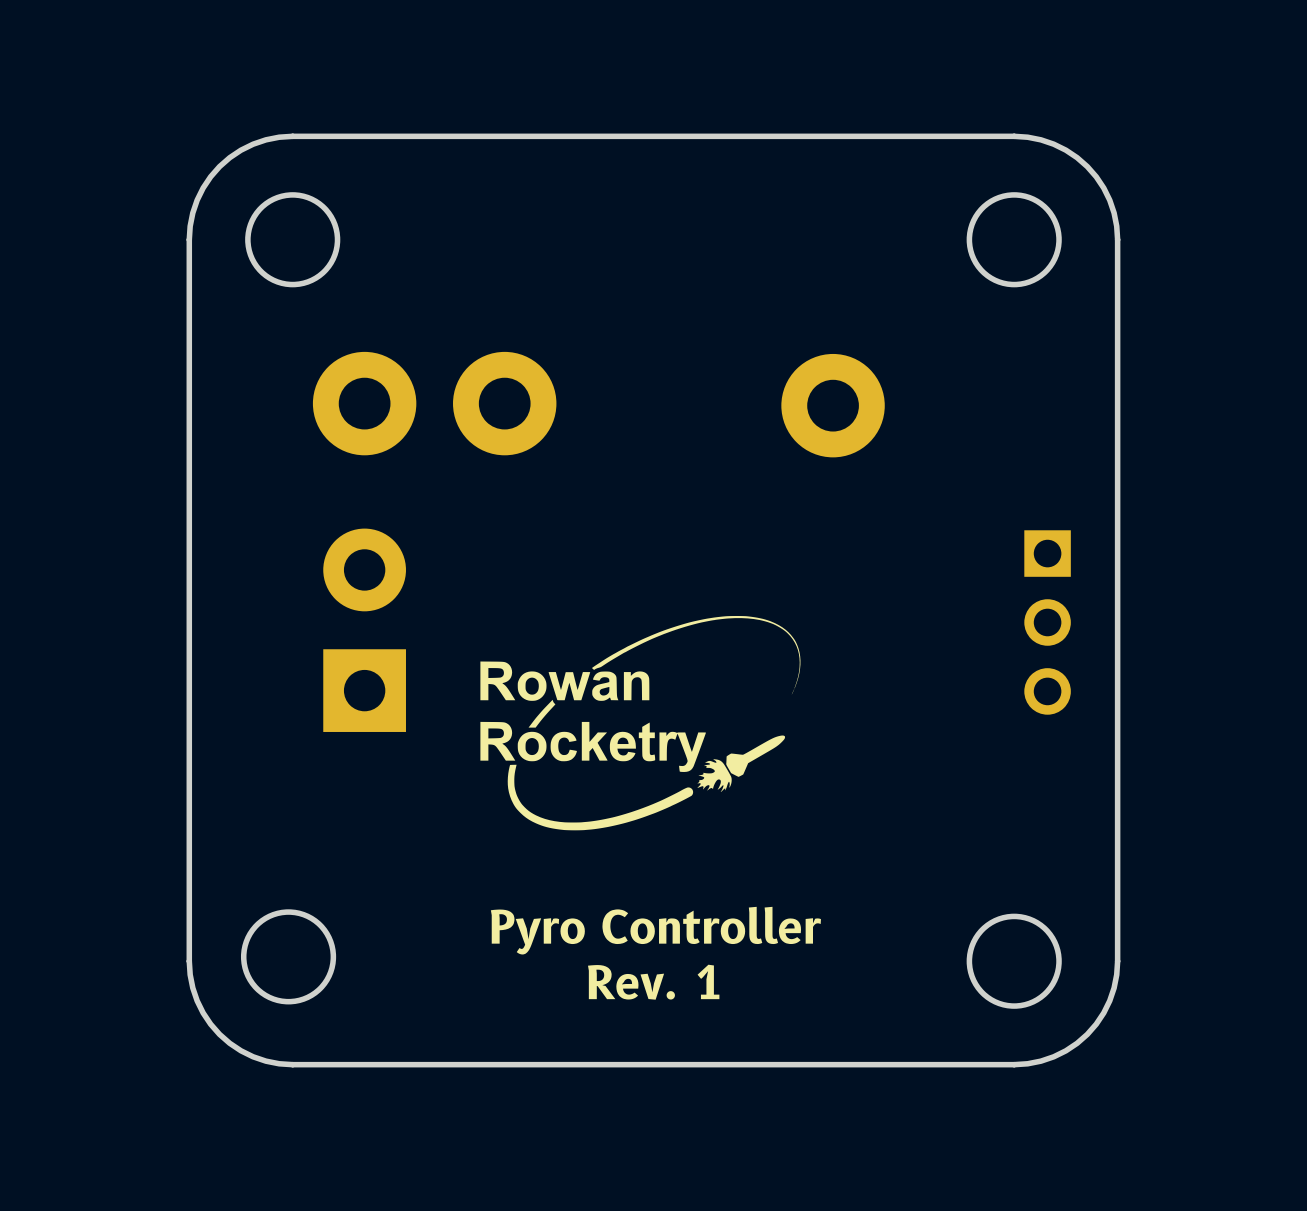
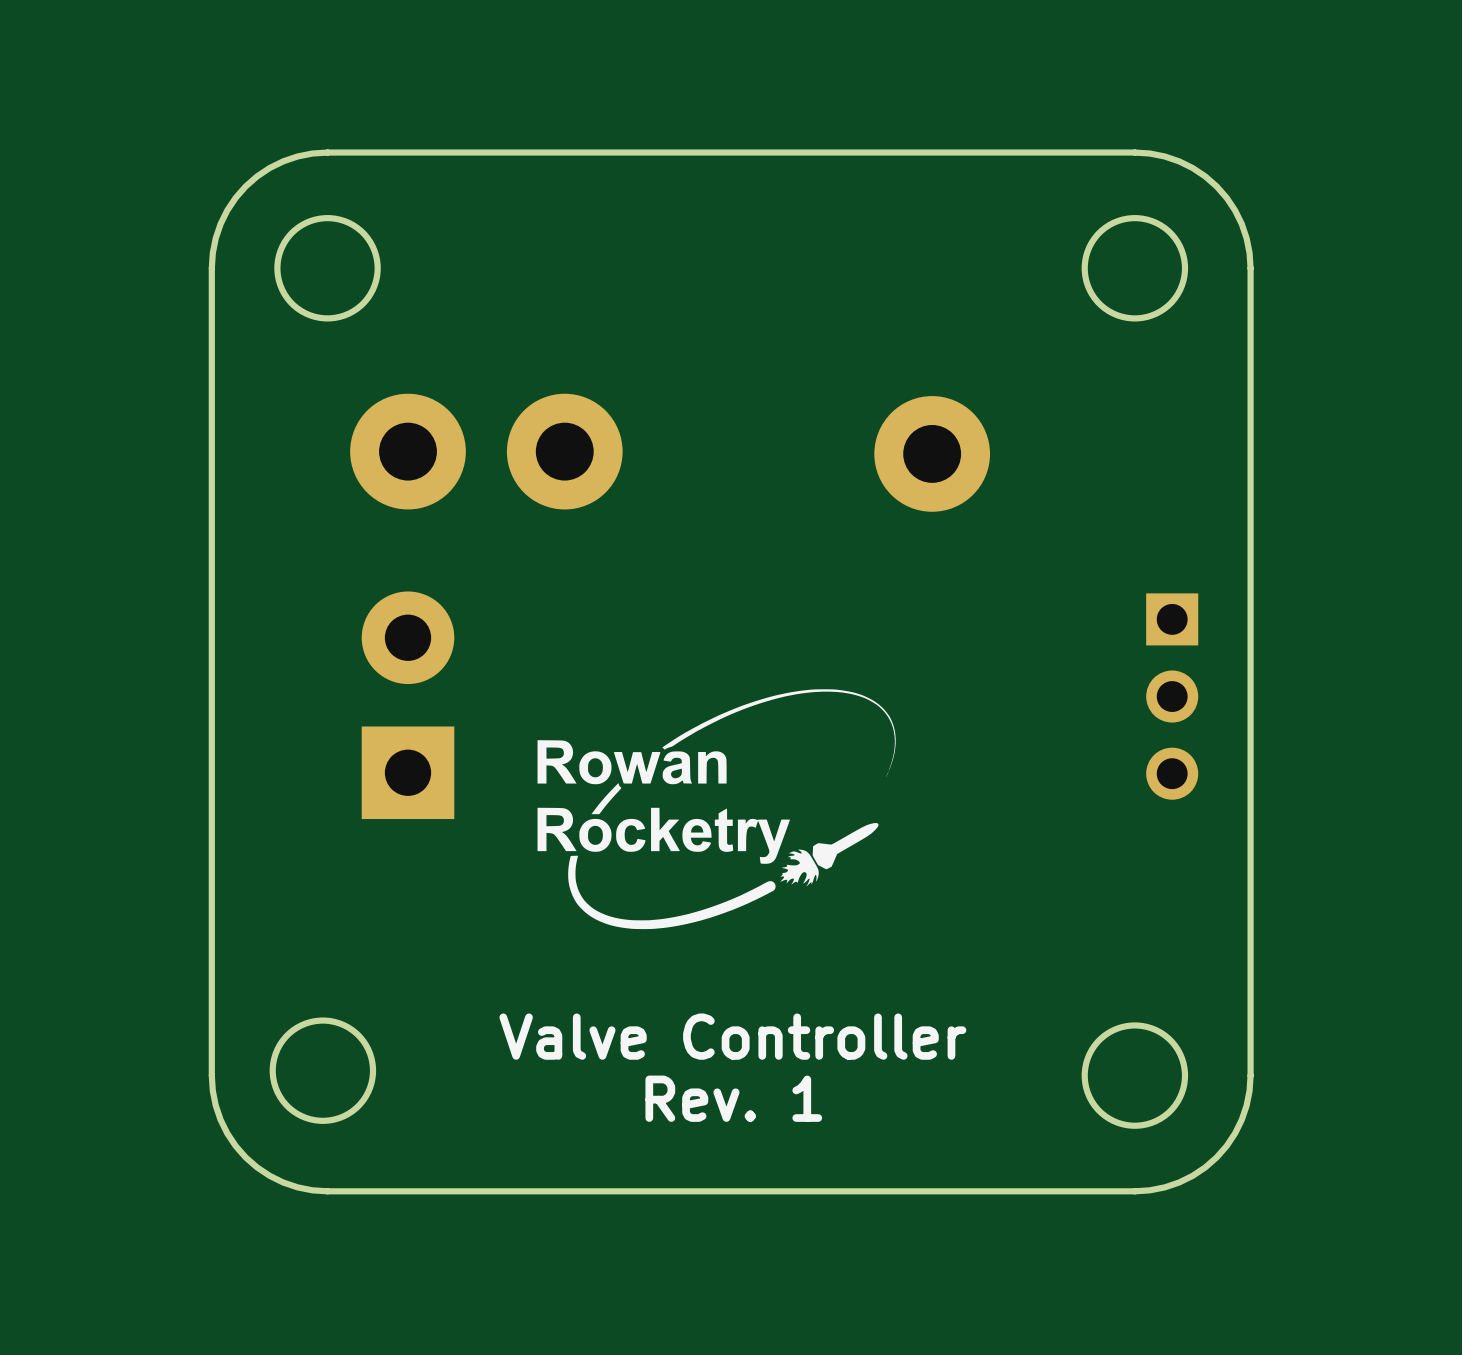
text: Pyro Controller (655, 930) -> Valve Controller (732, 1036)

